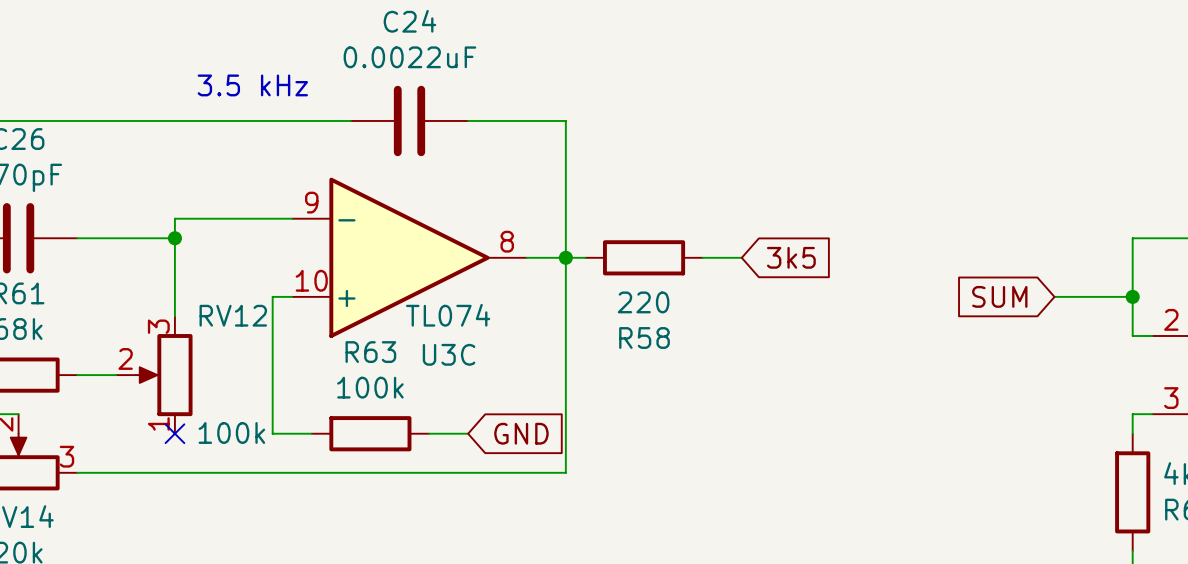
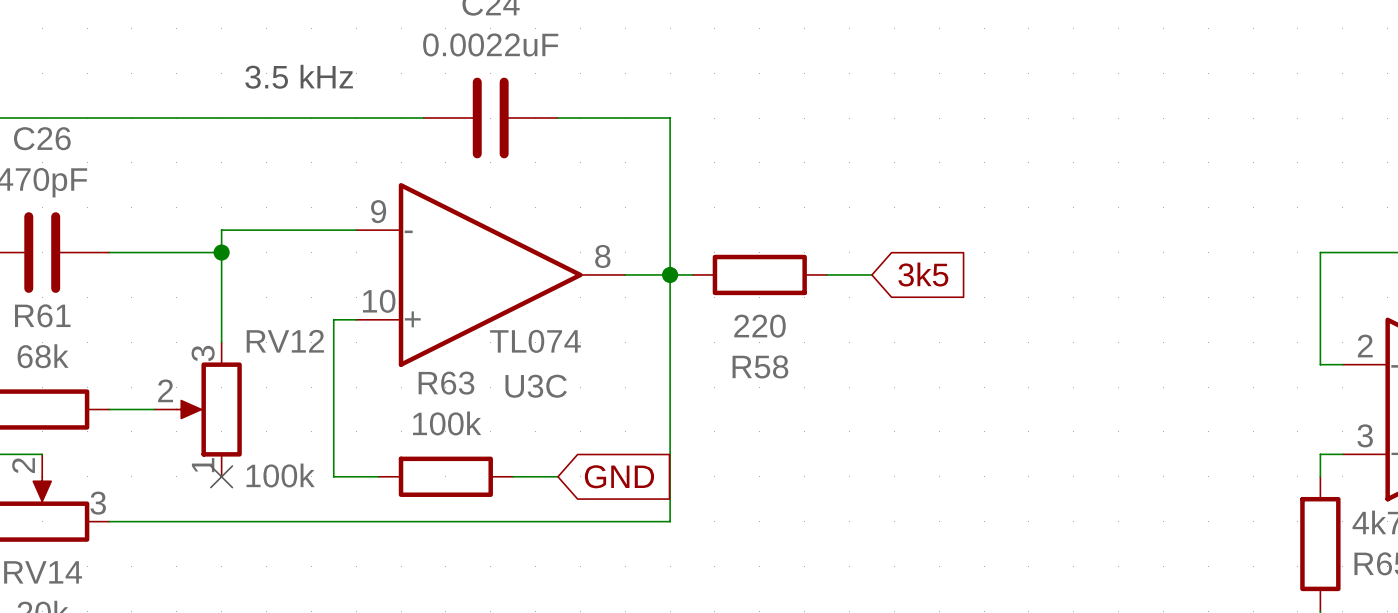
global label: SUM (999, 296) -> none
wire: (1054, 296) (1132, 296) -> none
junction: (1132, 296) -> none

